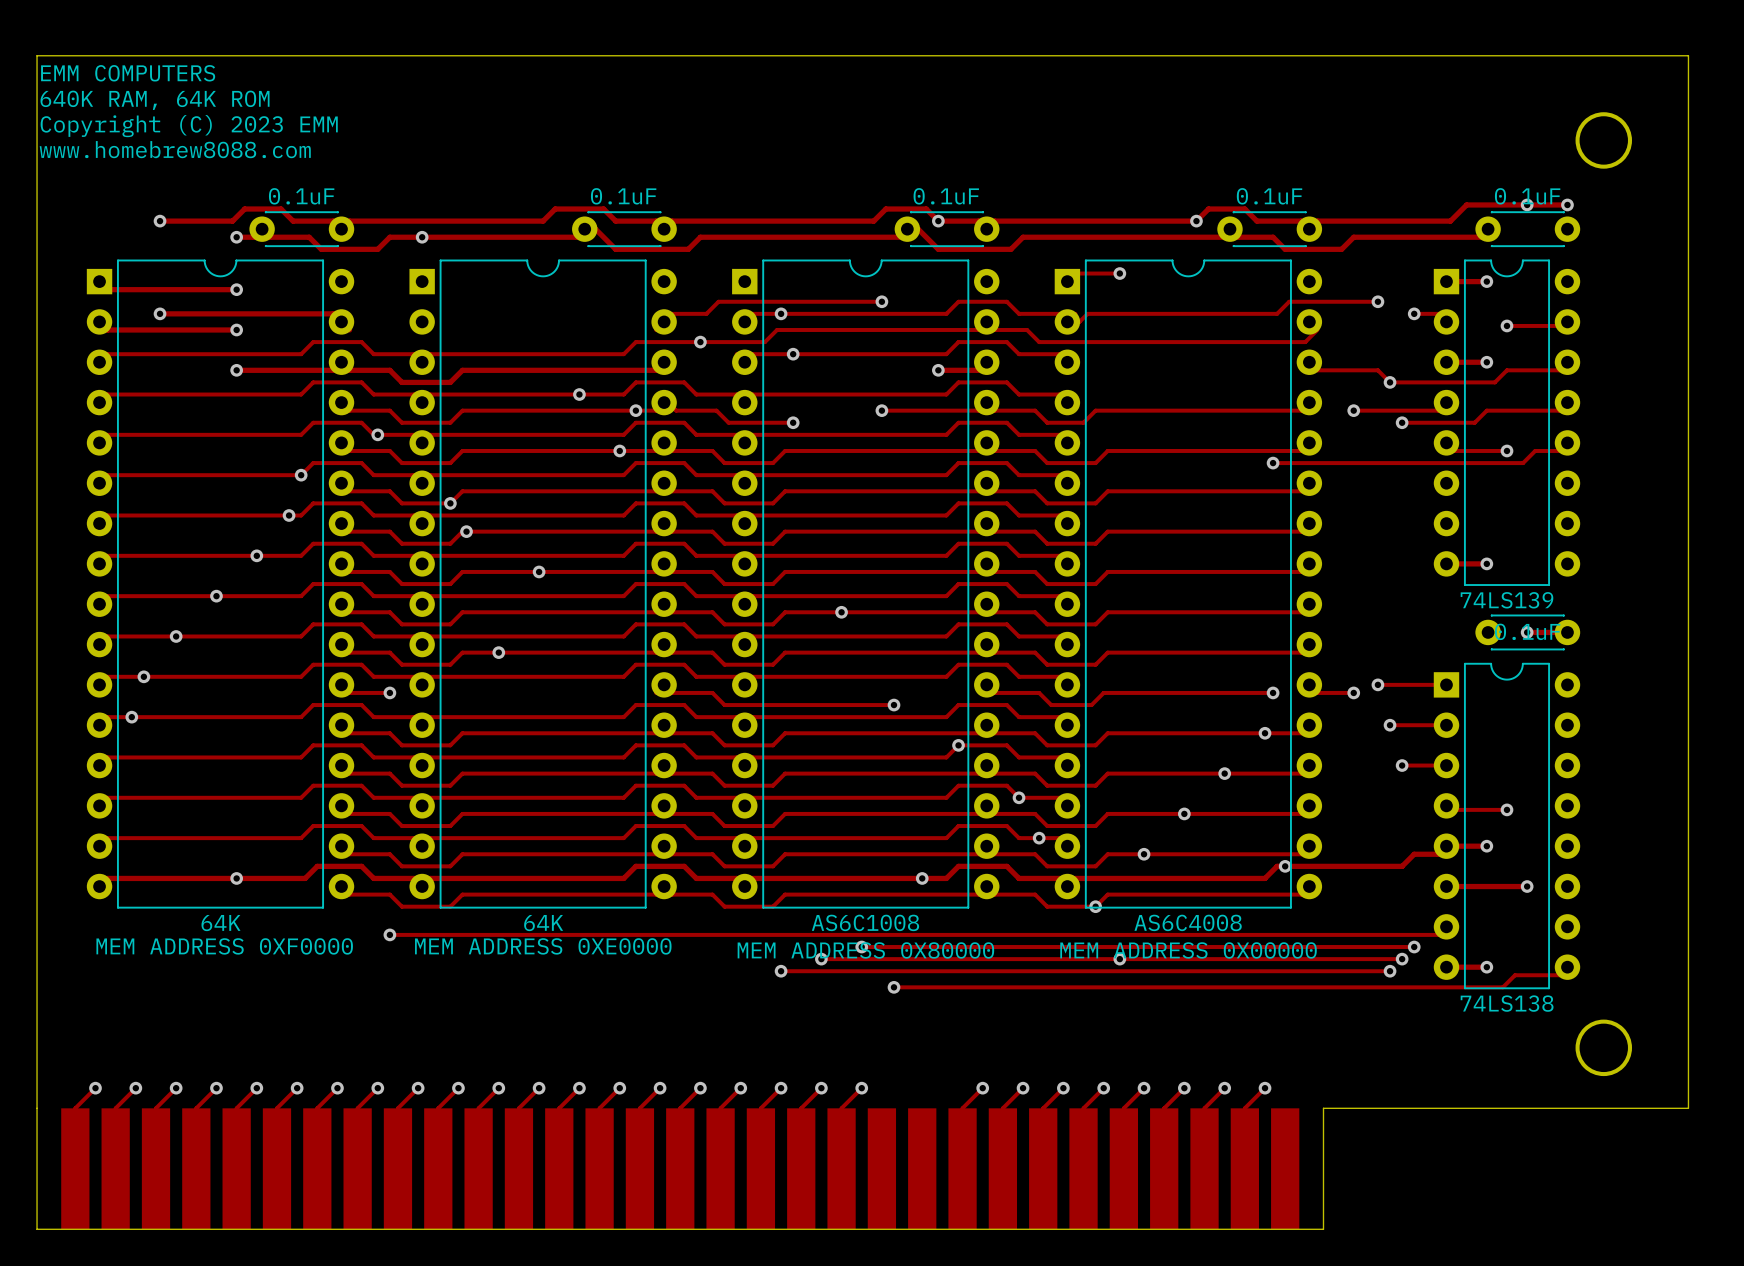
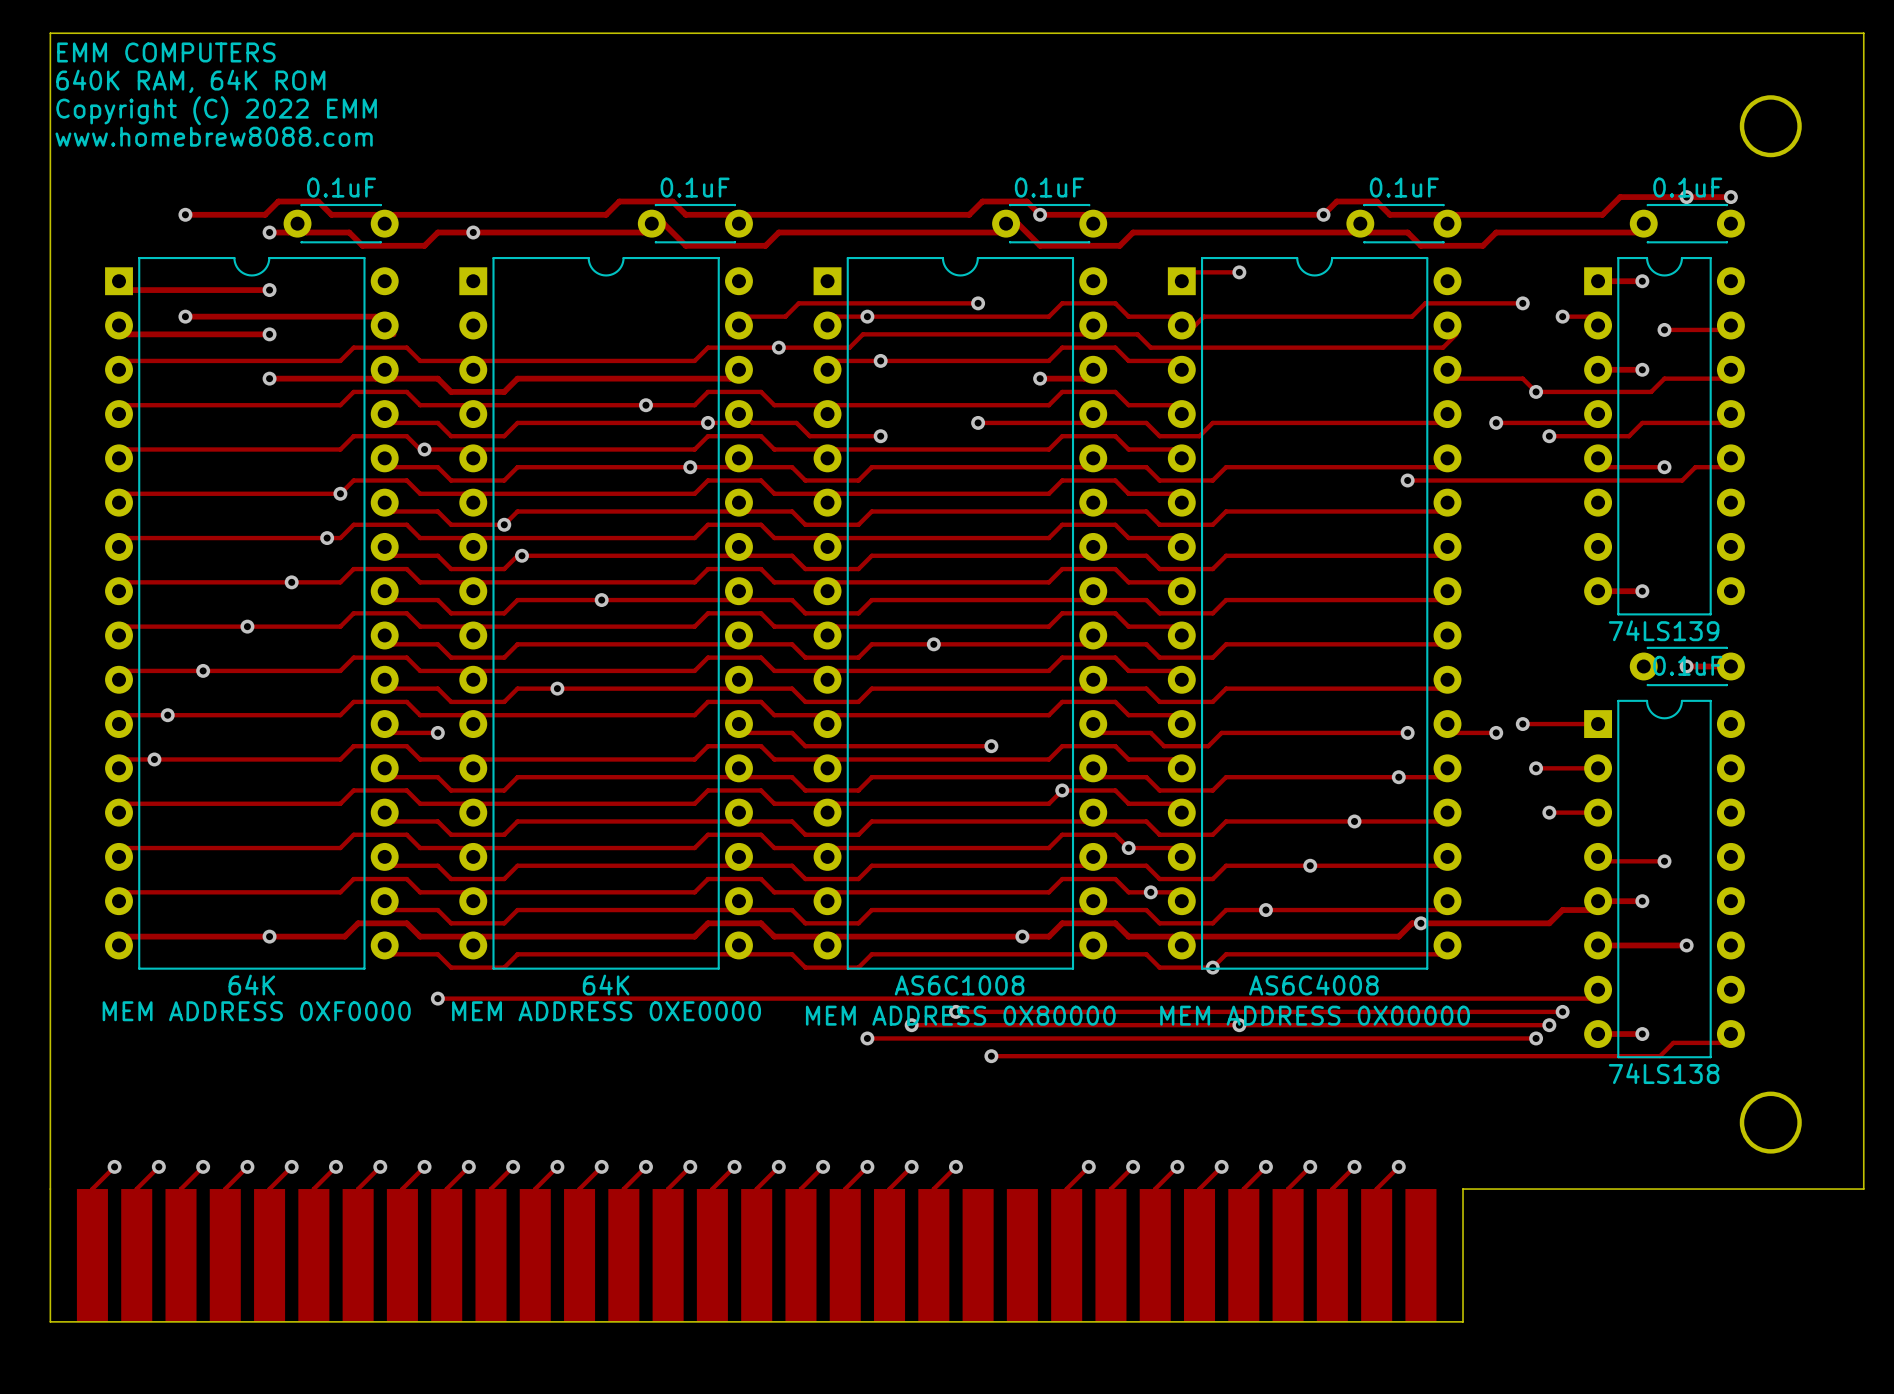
text: Copyright (C) 2023 EMM (189, 126) -> Copyright (C) 2022 EMM (216, 110)

